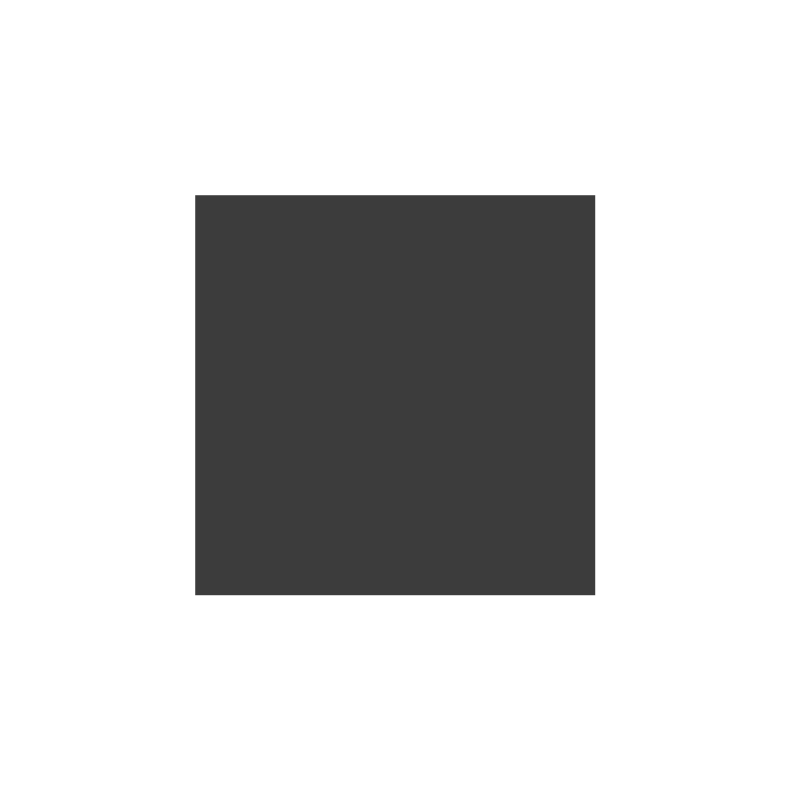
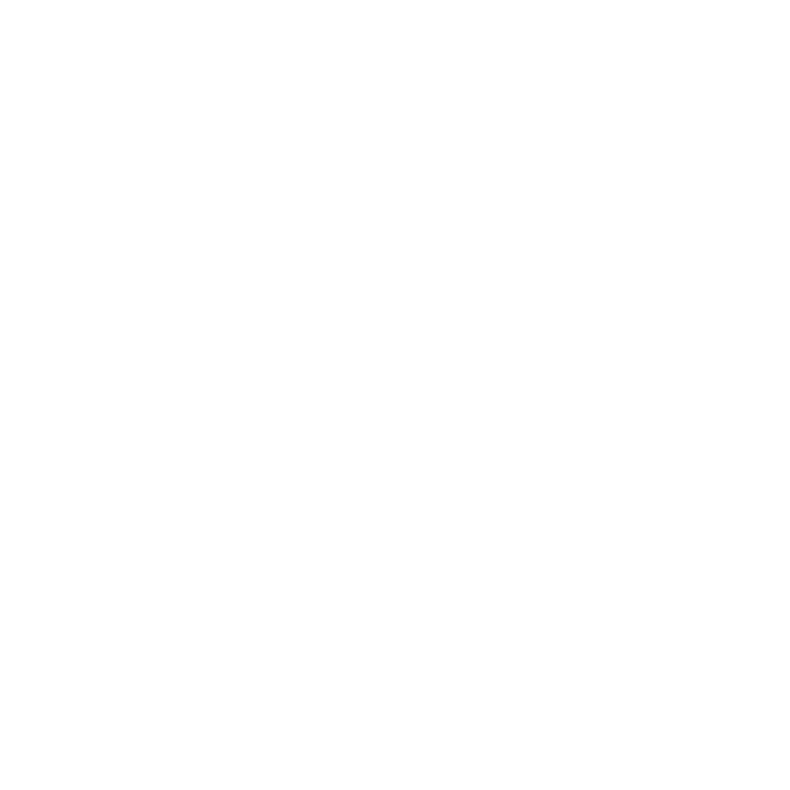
drawing: [195, 195, 596, 596] -> none

